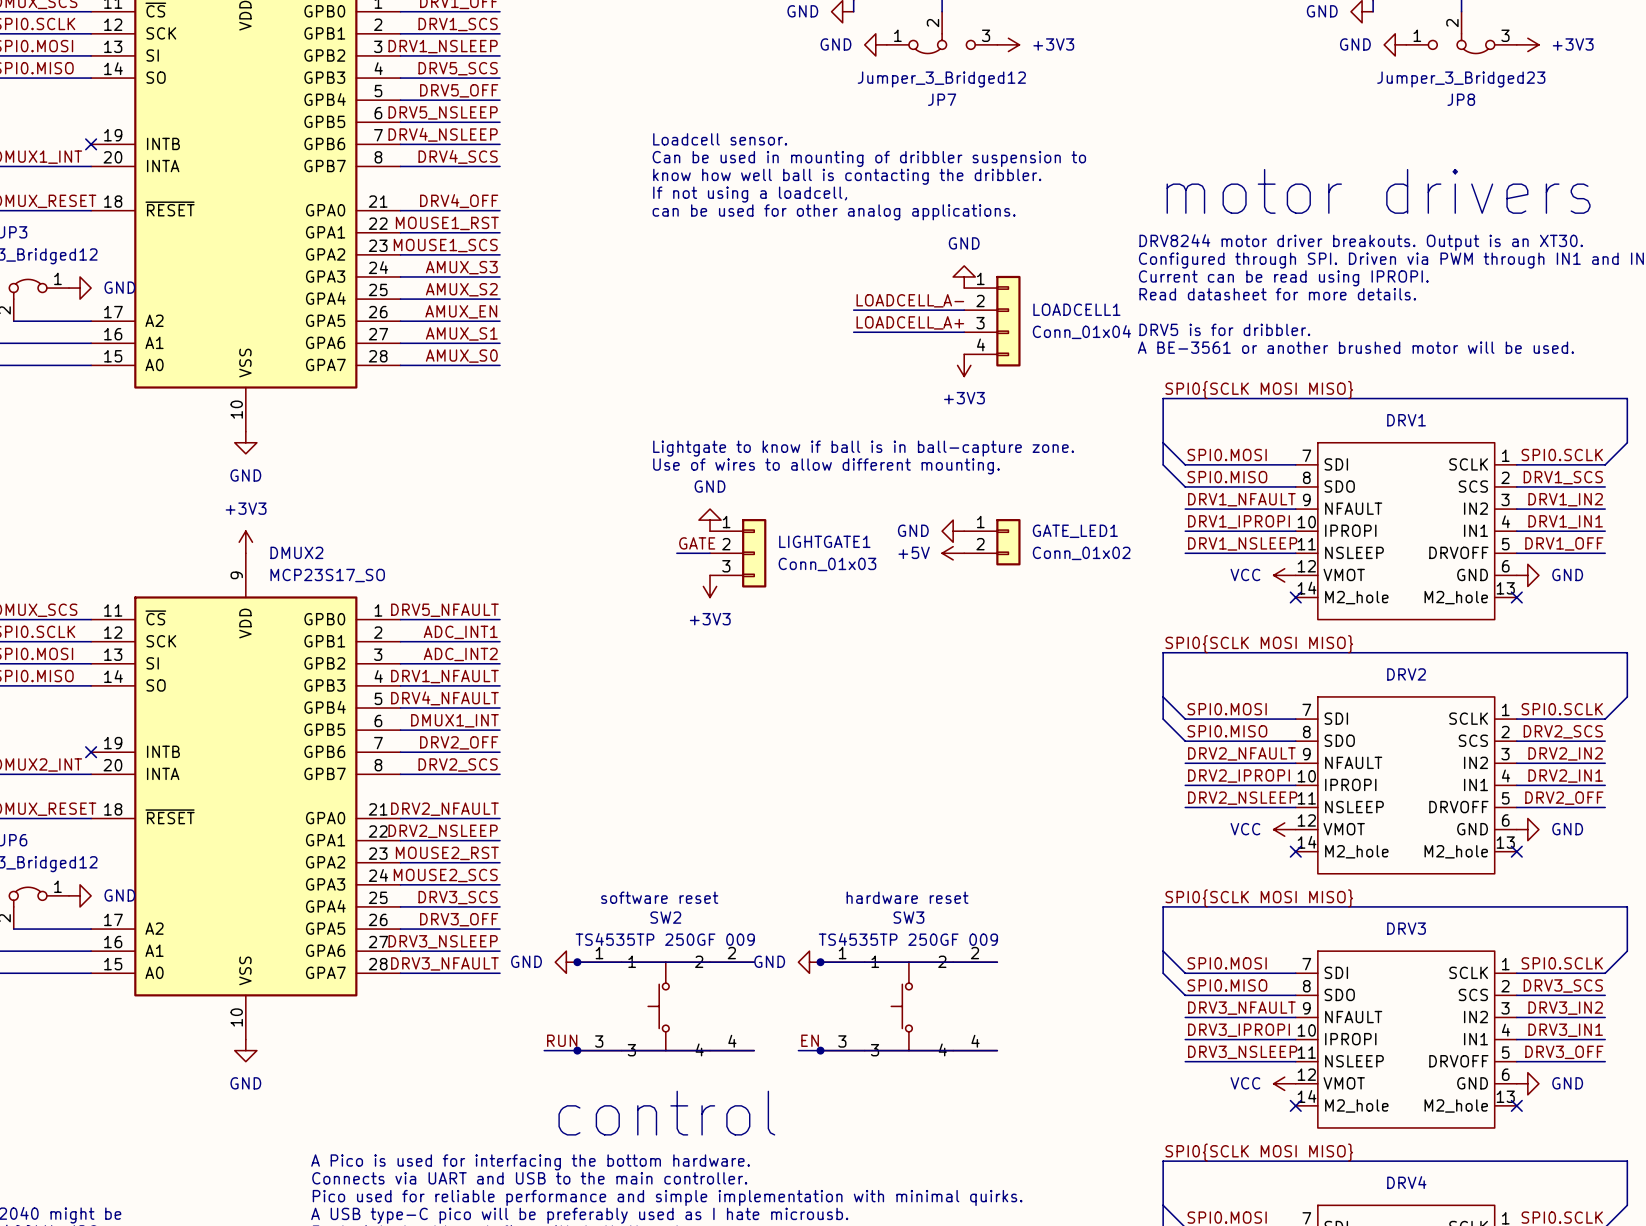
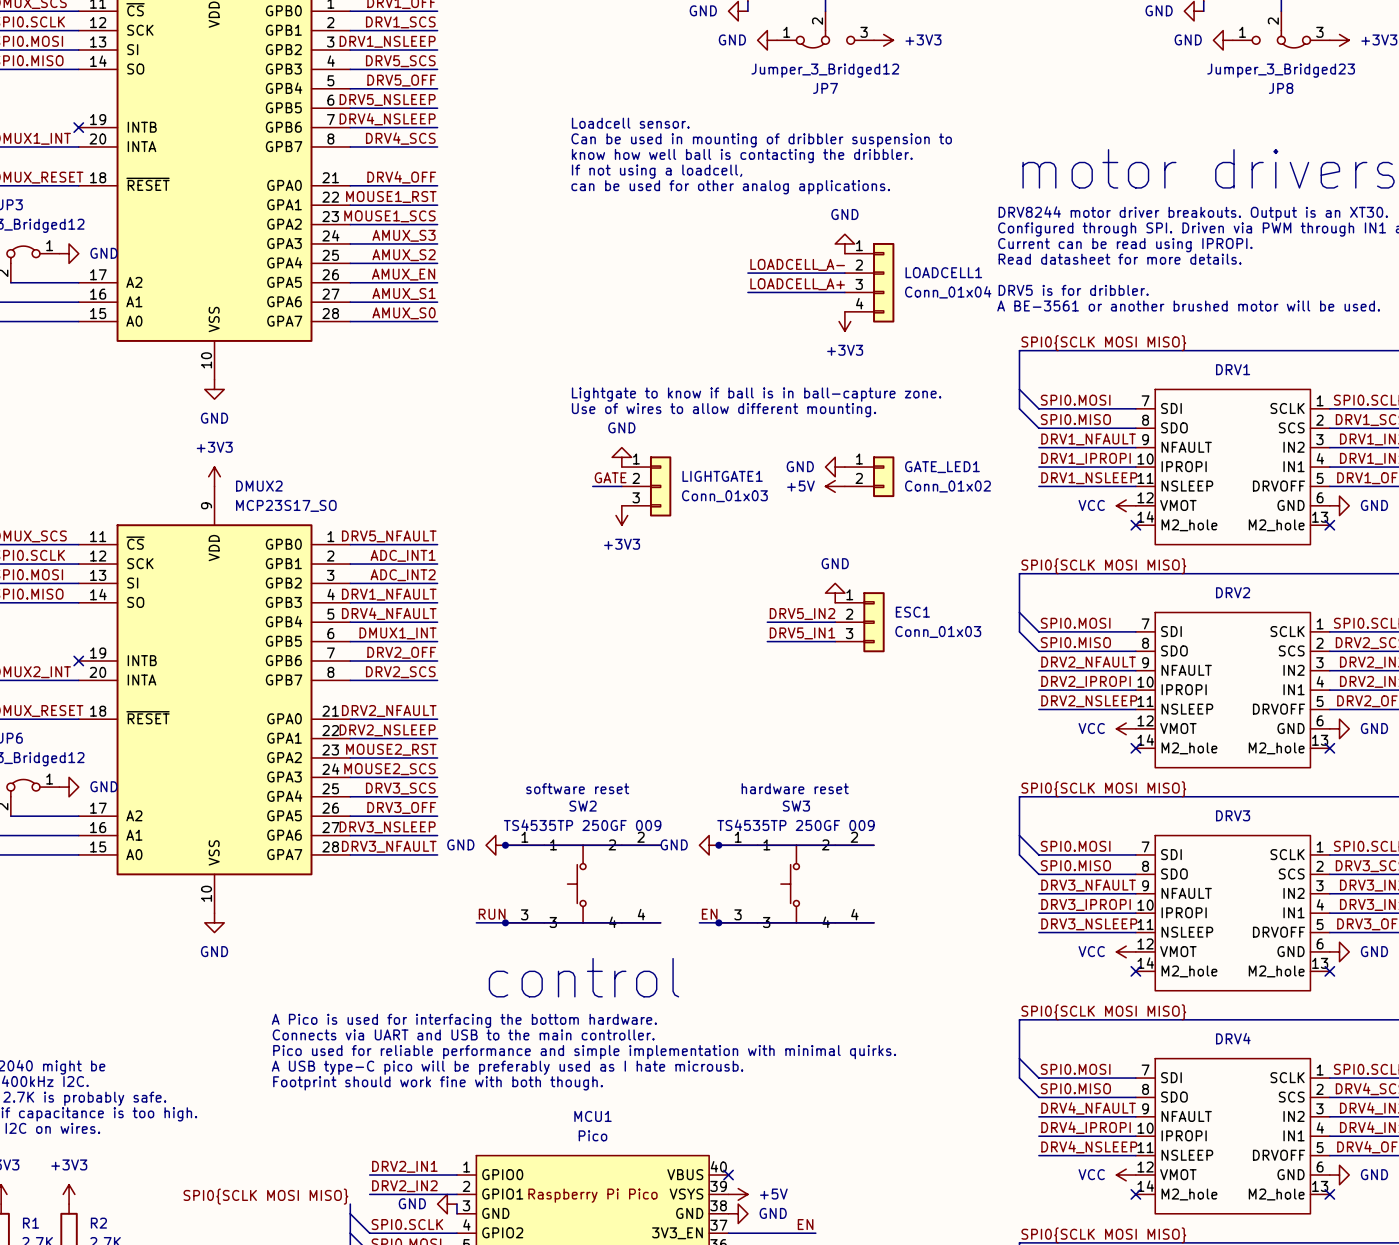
power symbol: none -> GND (835, 593)
label: none -> DRV5_IN2 (802, 614)
wire: none -> (767, 622) (835, 622)
ESC1: none -> Conn_01x03 (859, 622)
label: none -> DRV5_IN1 (802, 633)
wire: none -> (767, 641) (835, 641)

